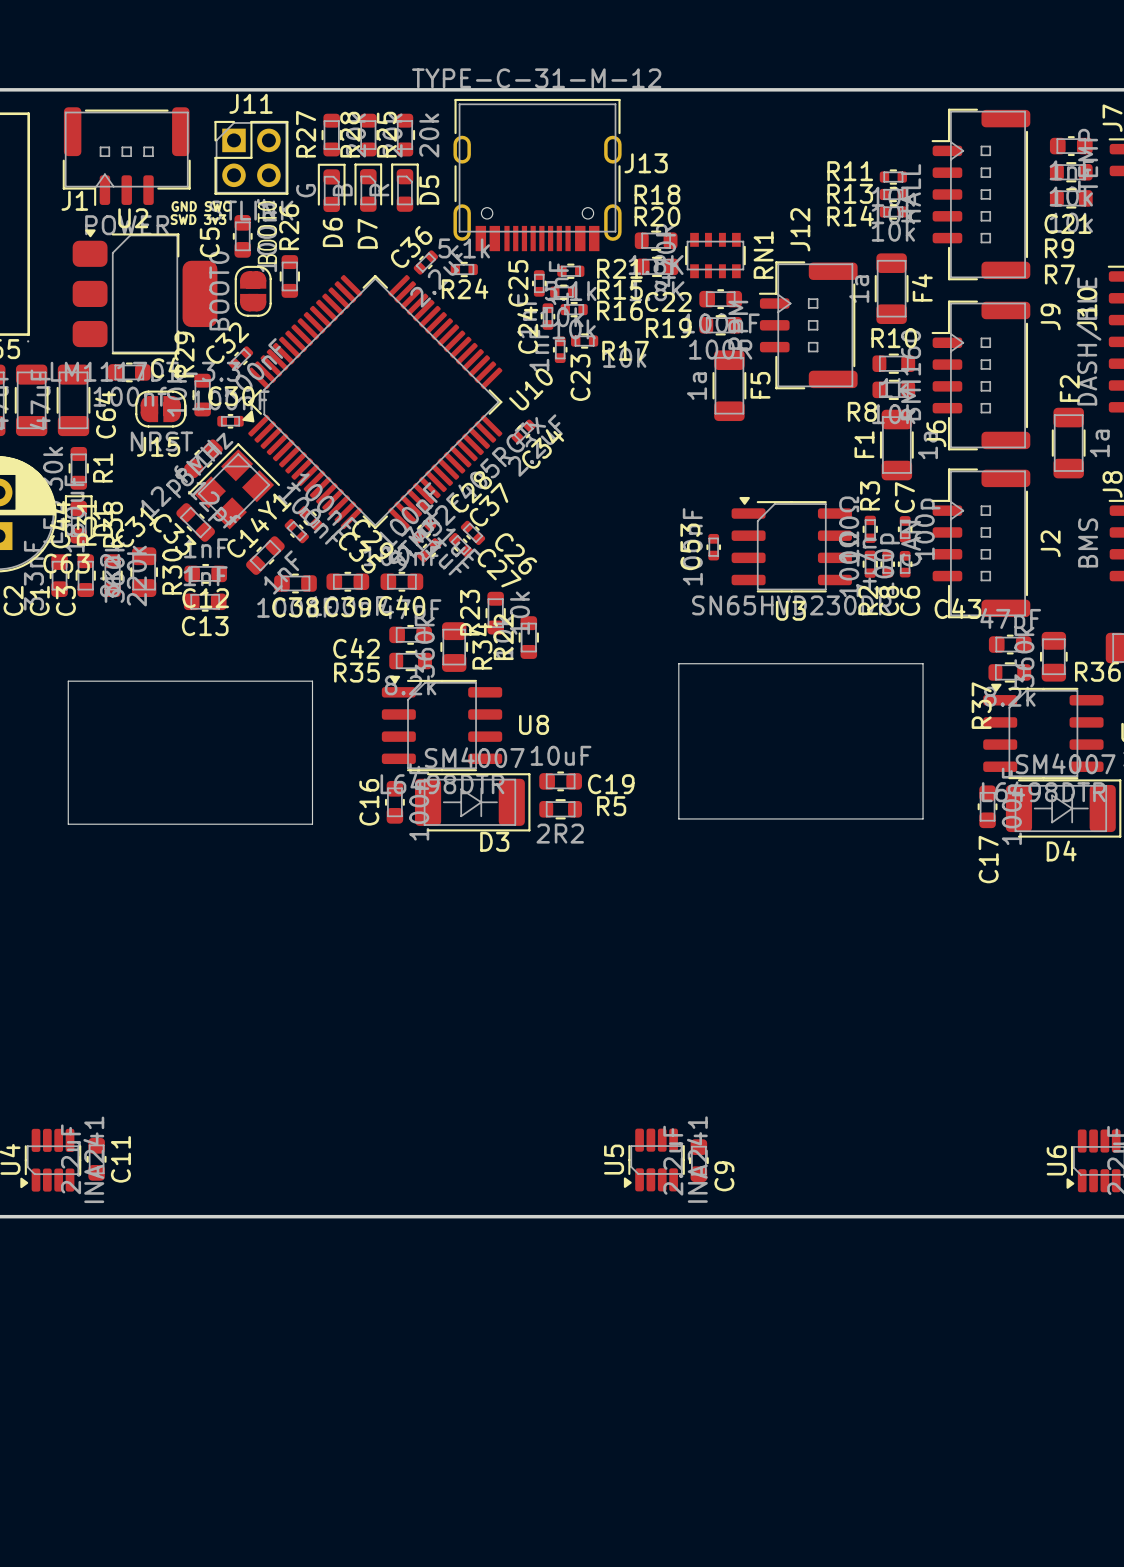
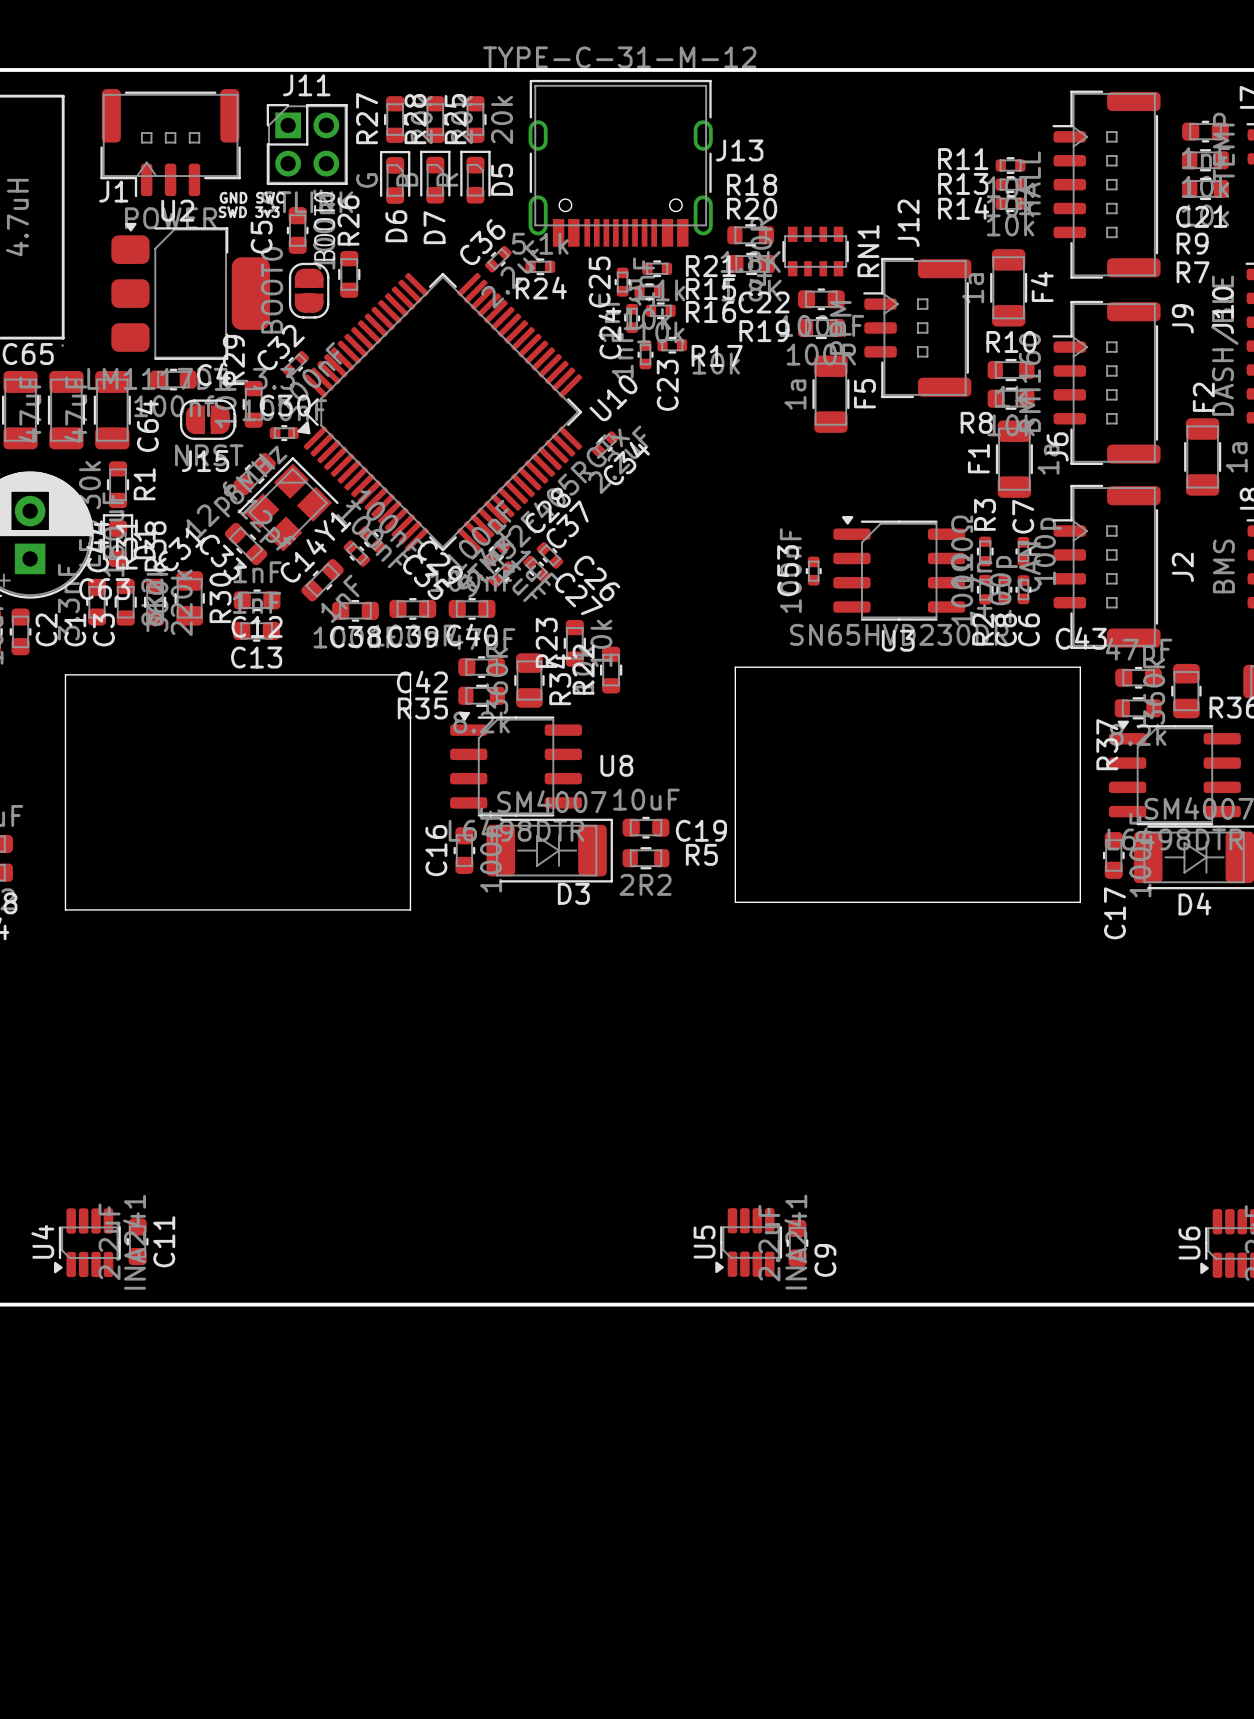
board edge: (678, 663) (923, 663) (923, 818) (678, 818) (678, 663) -> (735, 667) (735, 902) (1080, 902) (1080, 667) (735, 667)
board edge: (68, 681) (312, 681) (312, 824) (68, 824) (68, 681) -> (65, 674) (65, 909) (410, 909) (410, 674) (65, 674)

